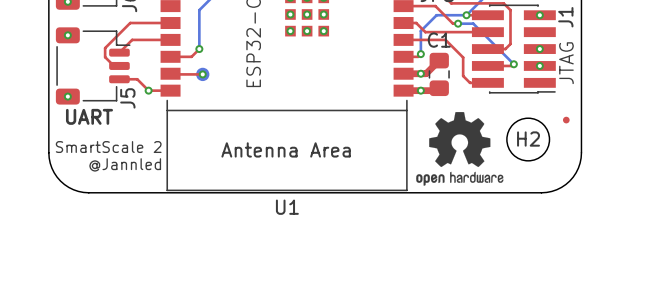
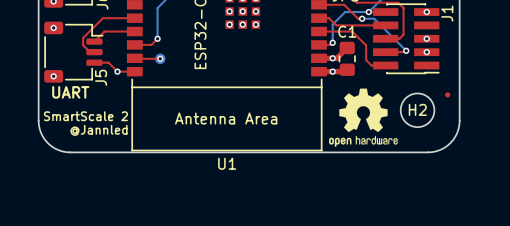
text: JTAG (566, 63) -> none

